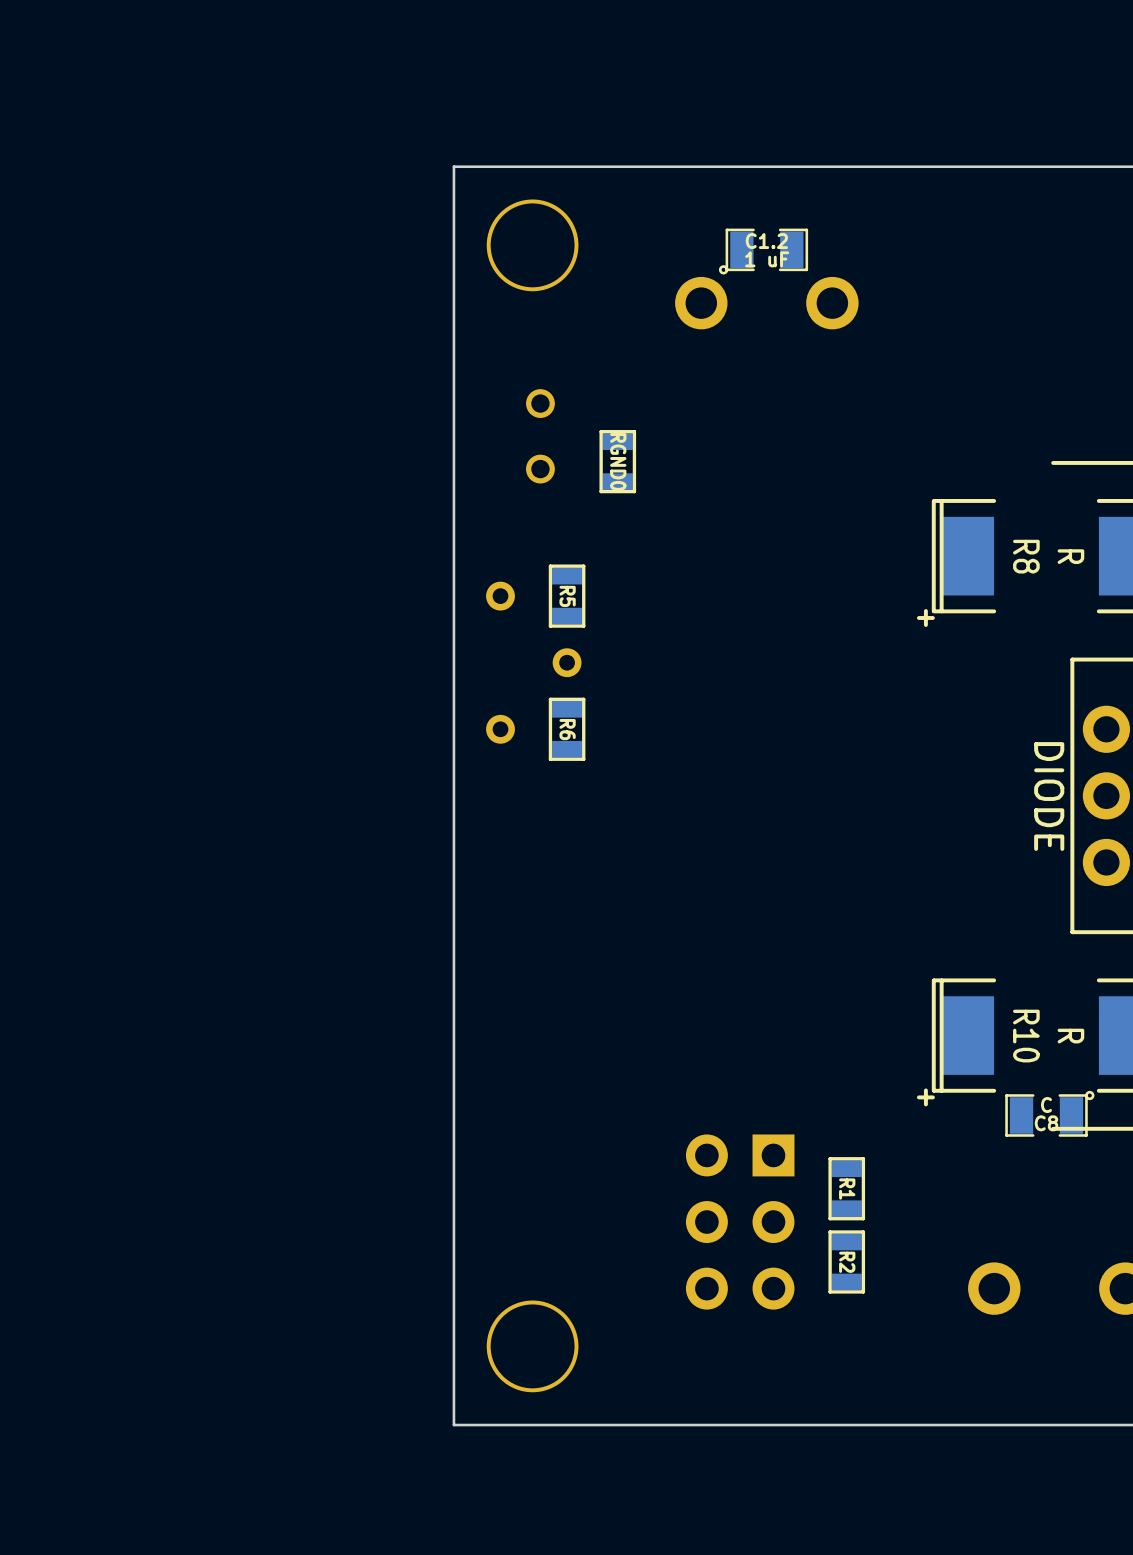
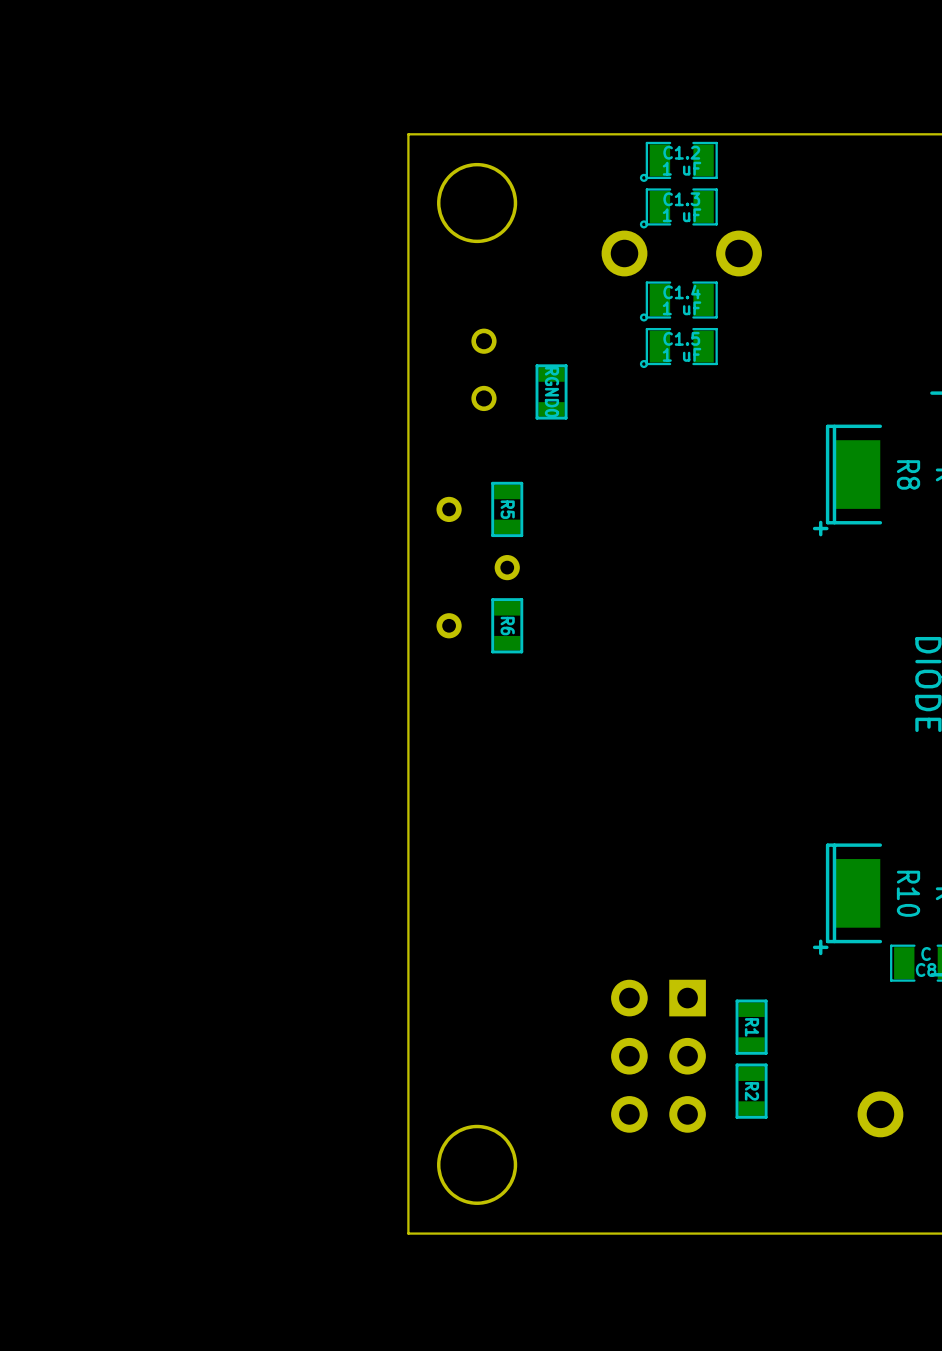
C1.2: none -> 1 uF (678, 161)
C1.2 name: C1.2 (766, 241) -> C1.3 (681, 199)
C1.4: none -> 1 uF (678, 301)
C1.5: none -> 1 uF (678, 348)

